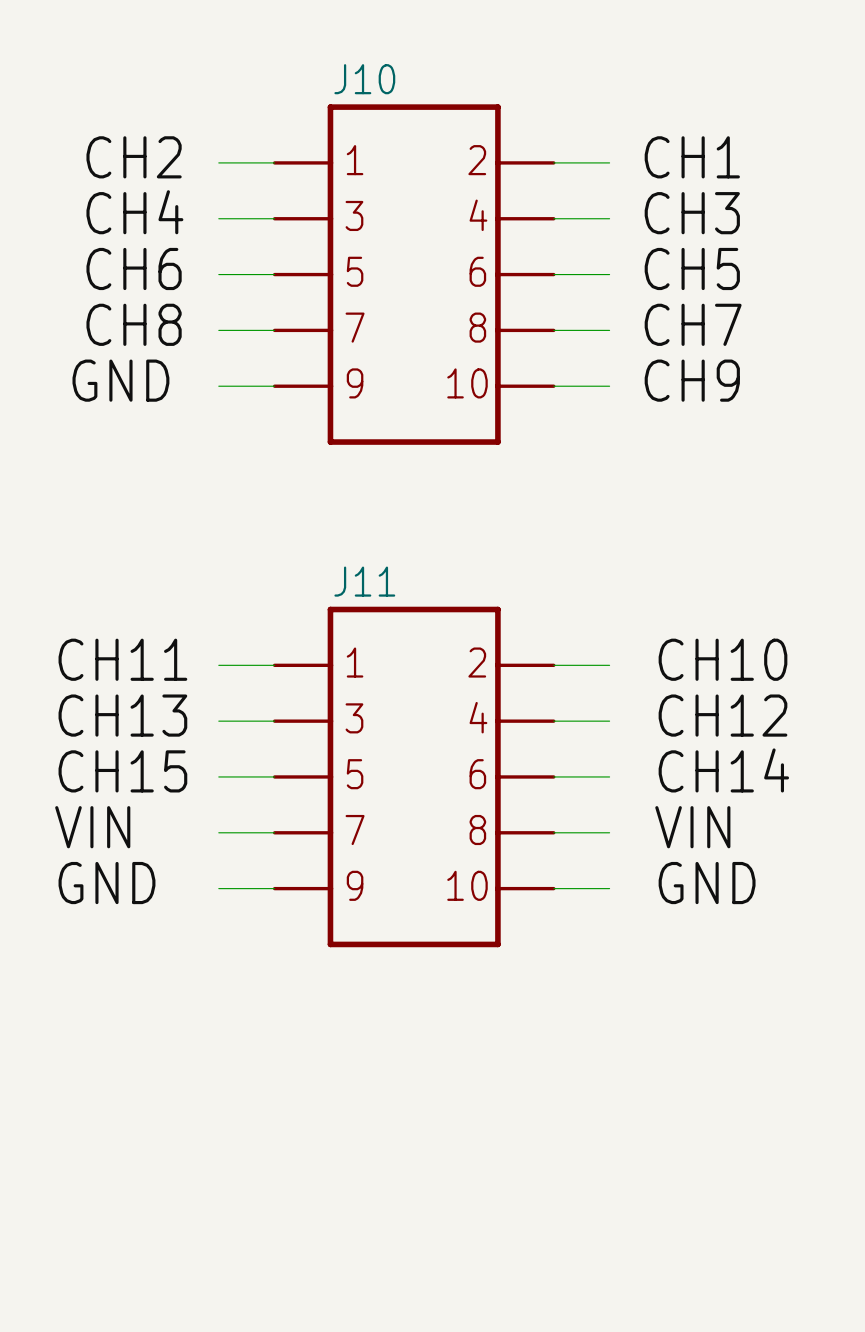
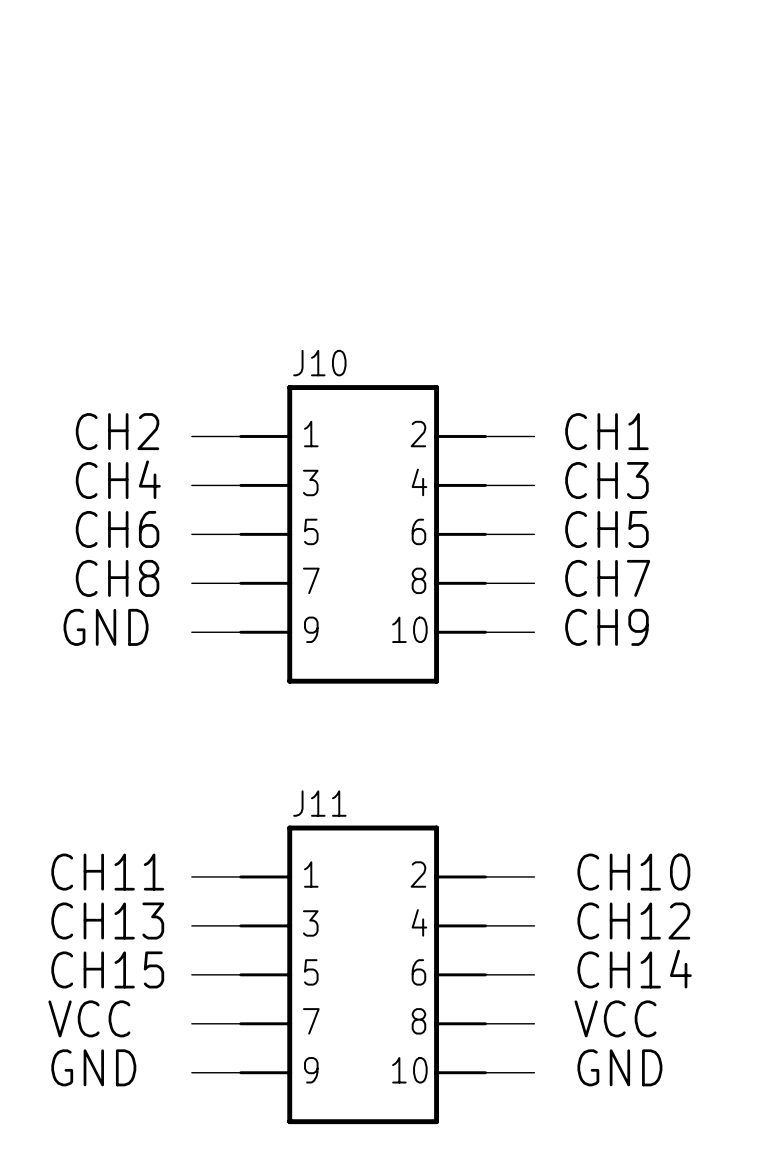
label position: CH2 (134, 157) -> CH2 (117, 431)
label position: CH1 (692, 157) -> CH1 (606, 431)
wire: (218, 162) (274, 162) -> none
wire: (553, 162) (609, 162) -> none
label position: CH4 (134, 212) -> CH4 (118, 479)
label position: CH3 (692, 213) -> CH3 (606, 480)
wire: (218, 218) (274, 218) -> none
wire: (553, 218) (609, 218) -> none
label position: CH6 (134, 268) -> CH6 (117, 529)
label position: CH5 (692, 268) -> CH5 (606, 529)
wire: (218, 274) (274, 274) -> (191, 436) (240, 436)
J10 position: (414, 274) -> (363, 534)
wire: (553, 274) (609, 274) -> (485, 436) (534, 436)
label position: CH8 (134, 324) -> CH8 (117, 578)
label position: CH7 (693, 324) -> CH7 (607, 578)
wire: (218, 330) (274, 330) -> (191, 485) (240, 485)
wire: (553, 330) (609, 330) -> (485, 485) (534, 485)
label: GND (120, 380) -> none
label position: CH9 (692, 380) -> CH9 (606, 627)
wire: (218, 386) (274, 386) -> (191, 534) (240, 534)
wire: (553, 386) (609, 386) -> (485, 534) (534, 534)
label position: CH11 (122, 659) -> CH11 (107, 872)
label position: CH10 (722, 659) -> CH10 (633, 872)
label: none -> GND (106, 627)
label position: CH13 (122, 715) -> CH13 (107, 921)
label position: CH12 (722, 715) -> CH12 (633, 921)
label position: CH14 (723, 770) -> CH14 (634, 969)
label position: CH15 (122, 771) -> CH15 (107, 969)
wire: (218, 776) (274, 776) -> (191, 876) (240, 876)
J11 position: (414, 776) -> (363, 974)
wire: (553, 776) (609, 776) -> (485, 876) (534, 876)
label: VIN (92, 827) -> none
label: VIN (692, 827) -> none
wire: (218, 832) (274, 832) -> (191, 925) (240, 925)
wire: (553, 832) (609, 832) -> (485, 925) (534, 925)
label: GND (106, 883) -> none
label: GND (707, 883) -> none
wire: (218, 888) (274, 888) -> (191, 974) (240, 974)
wire: (553, 888) (609, 888) -> (485, 974) (534, 974)
label: none -> VCC (89, 1018)
label: none -> VCC (615, 1018)
wire: none -> (191, 1023) (240, 1023)
wire: none -> (485, 1023) (534, 1023)
label: none -> GND (93, 1067)
label: none -> GND (619, 1067)
wire: none -> (191, 1072) (240, 1072)
wire: none -> (485, 1072) (534, 1072)

